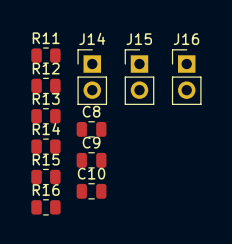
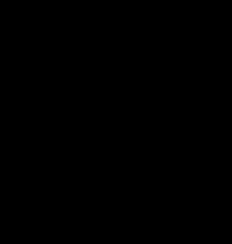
R11: (45, 55) -> none
J14: (92, 77) -> none
J15: (139, 77) -> none
J16: (186, 77) -> none
R12: (45, 85) -> none
R13: (45, 116) -> none
C8: (91, 129) -> none
R14: (45, 146) -> none
C9: (91, 160) -> none
R15: (45, 177) -> none
C10: (91, 191) -> none
R16: (45, 207) -> none

